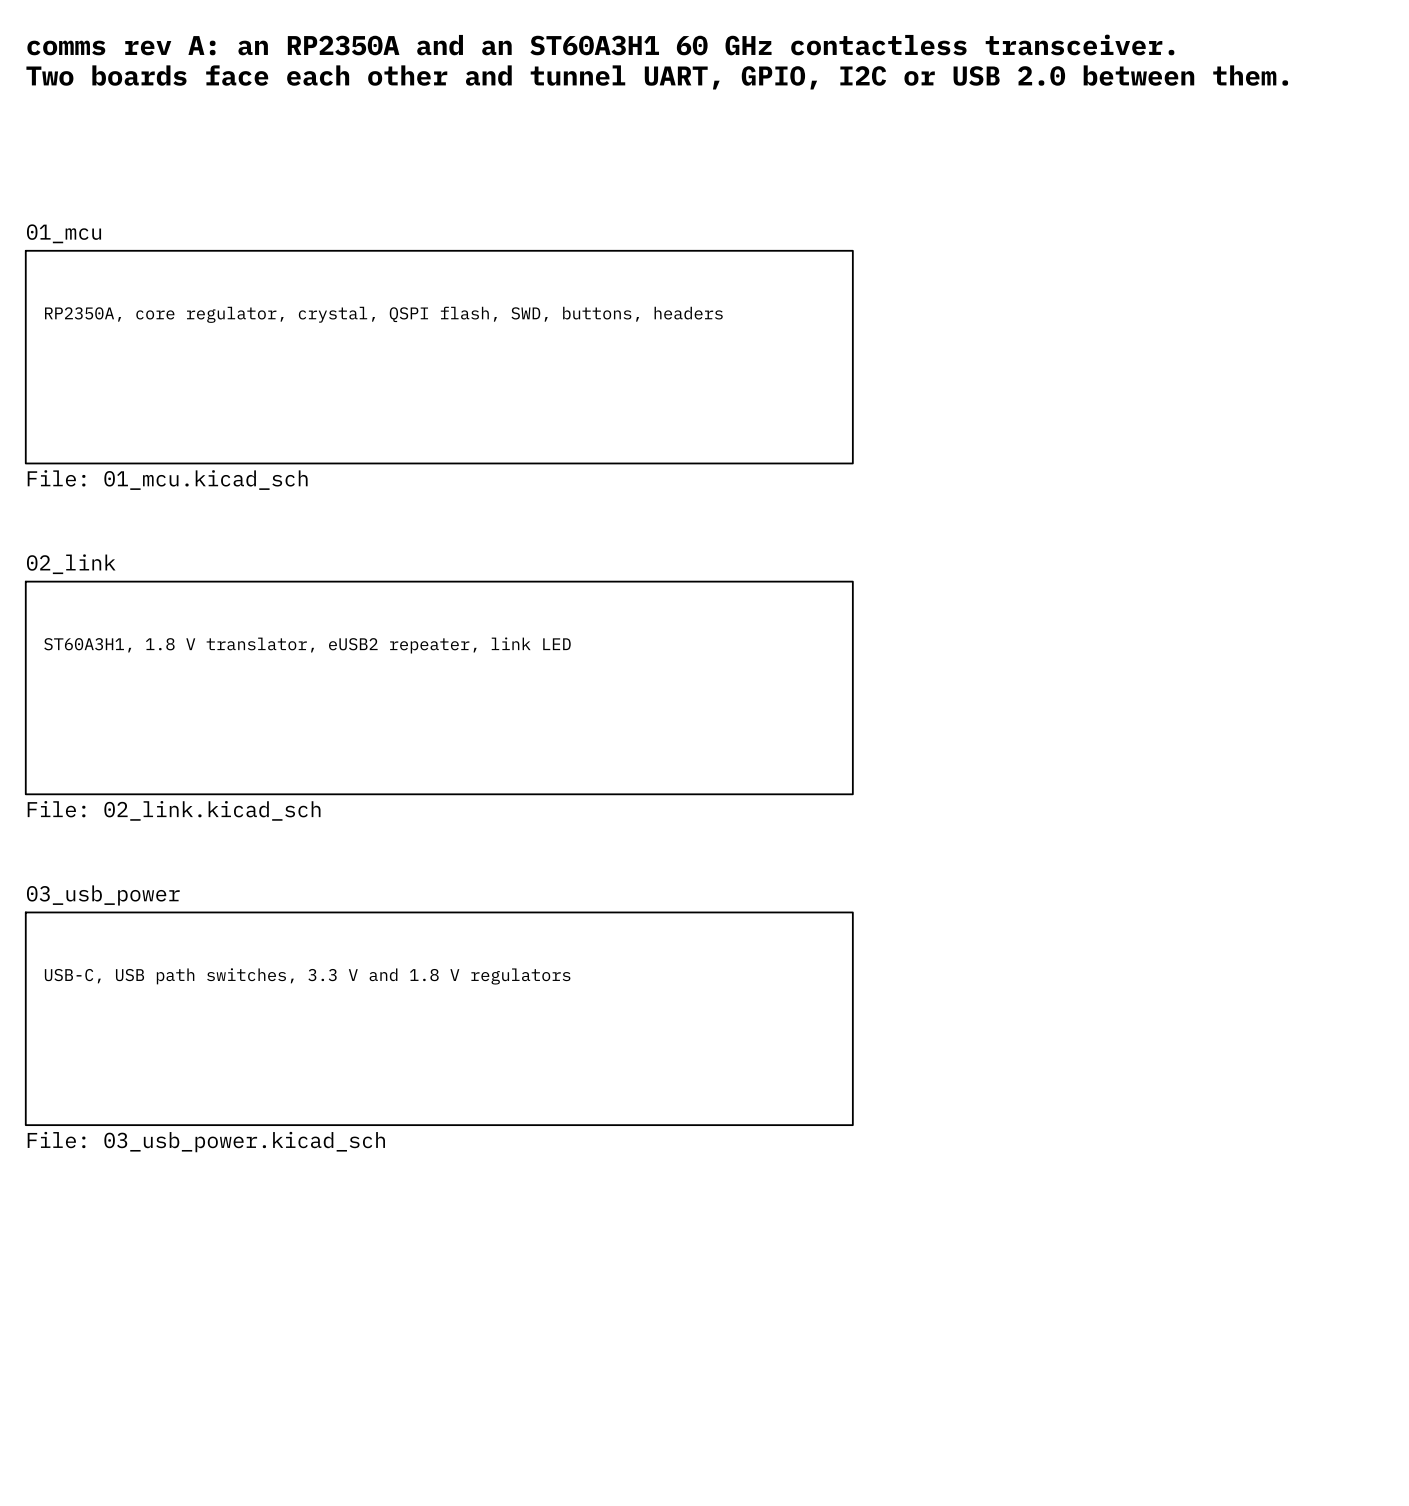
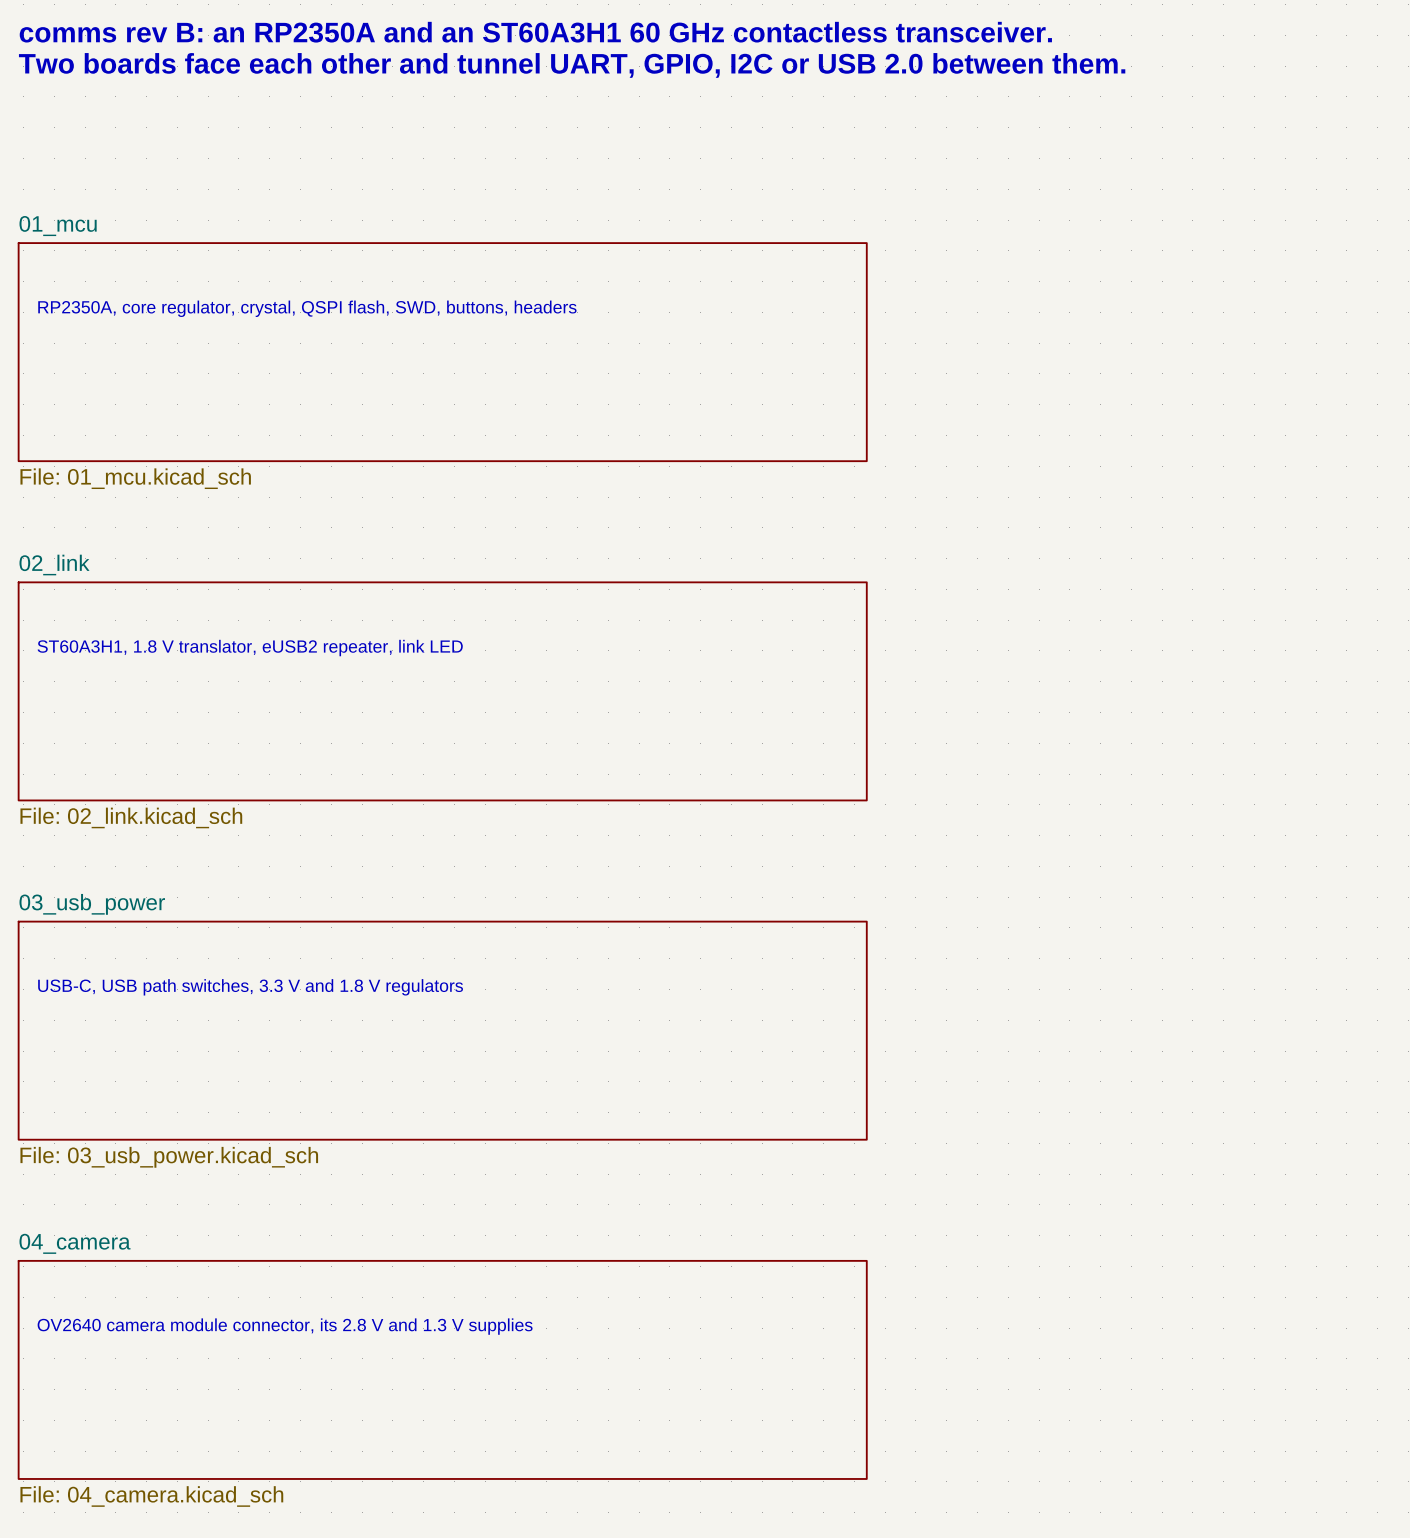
text: comms rev A: an RP2350A and an ST60A3H1 60 GHz contactless transceiver. (600, 44) -> comms rev B: an RP2350A and an ST60A3H1 60 GHz contactless transceiver. (535, 32)
text: none -> OV2640 camera module connector, its 2.8 V and 1.3 V supplies (285, 1326)
sheet 04_camera: none -> File: 04_camera.kicad_sch (442, 1369)

